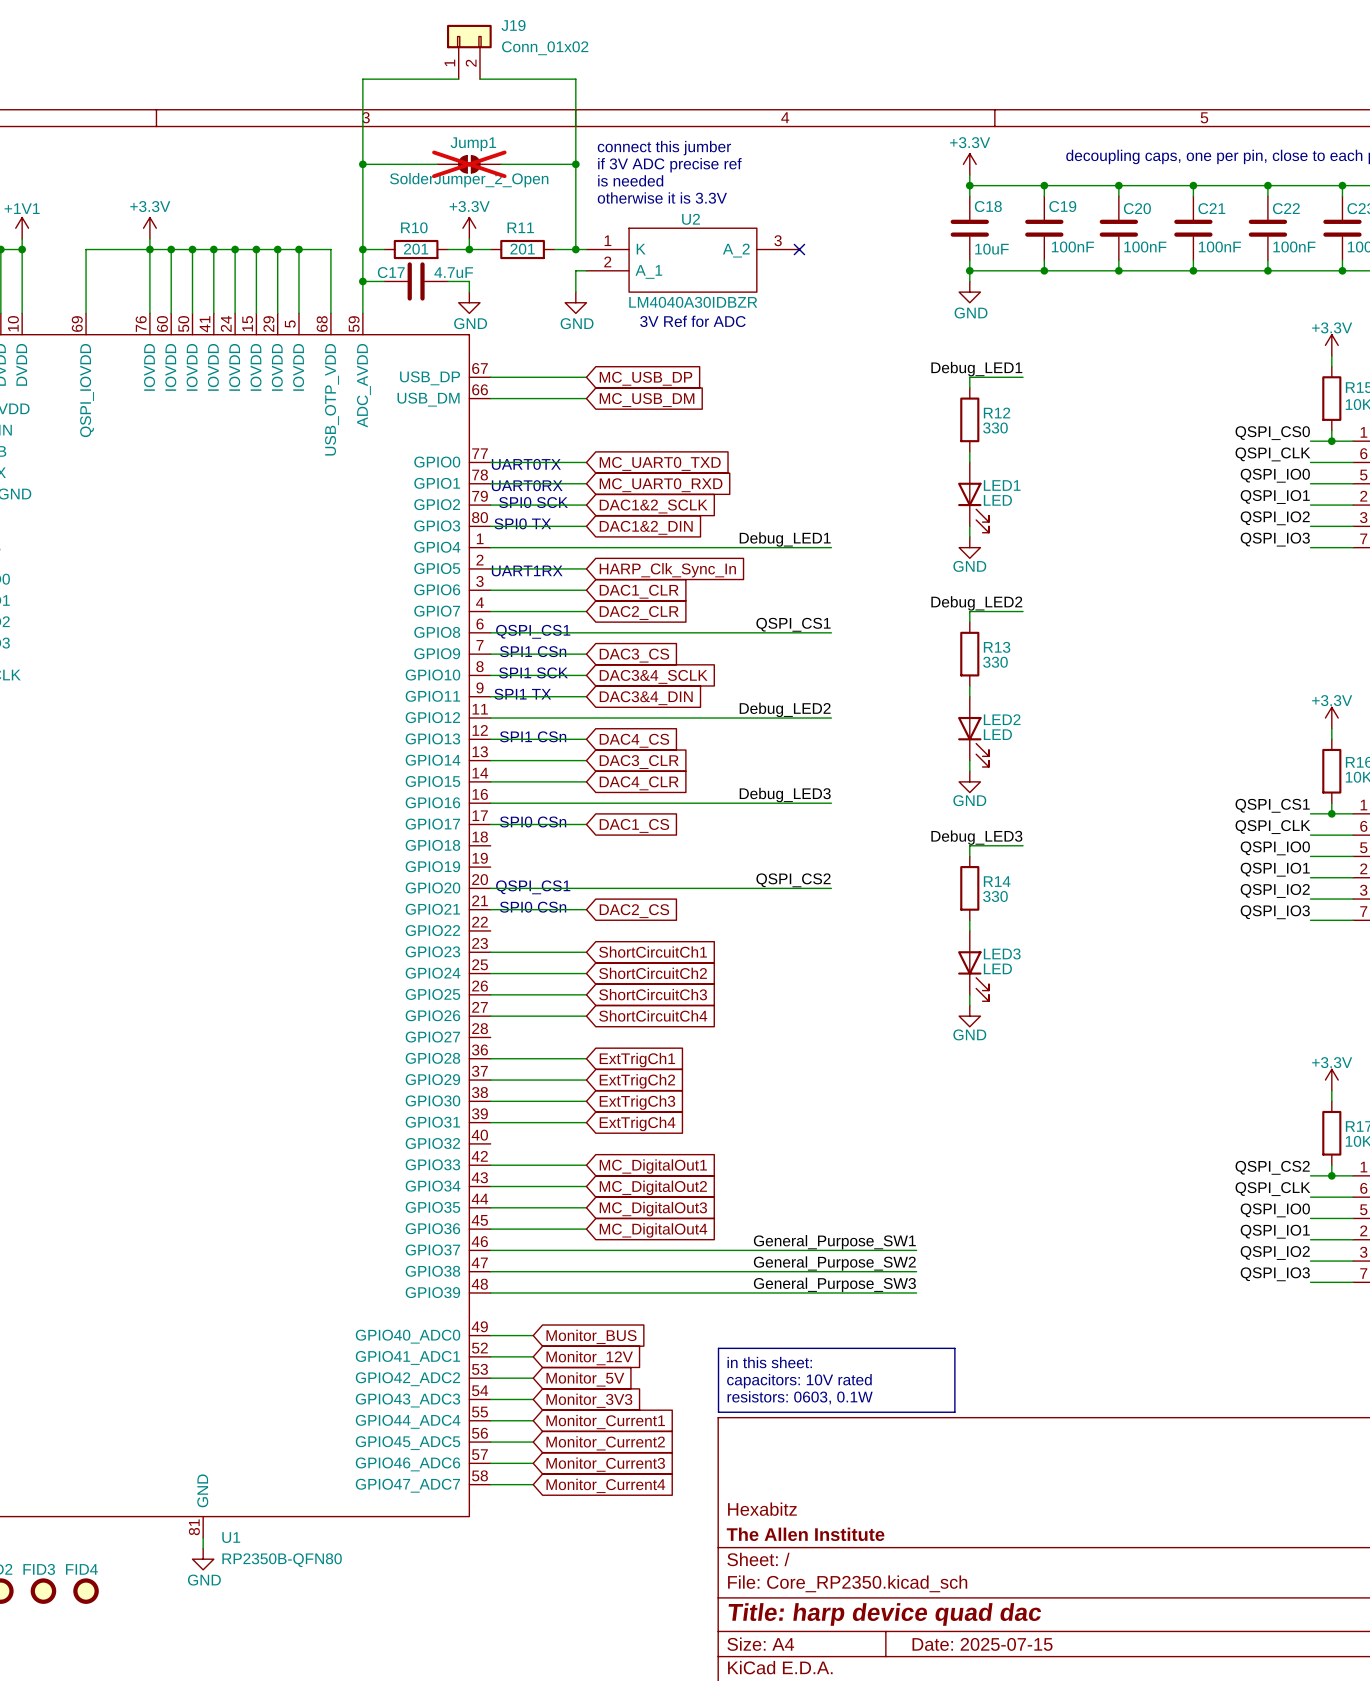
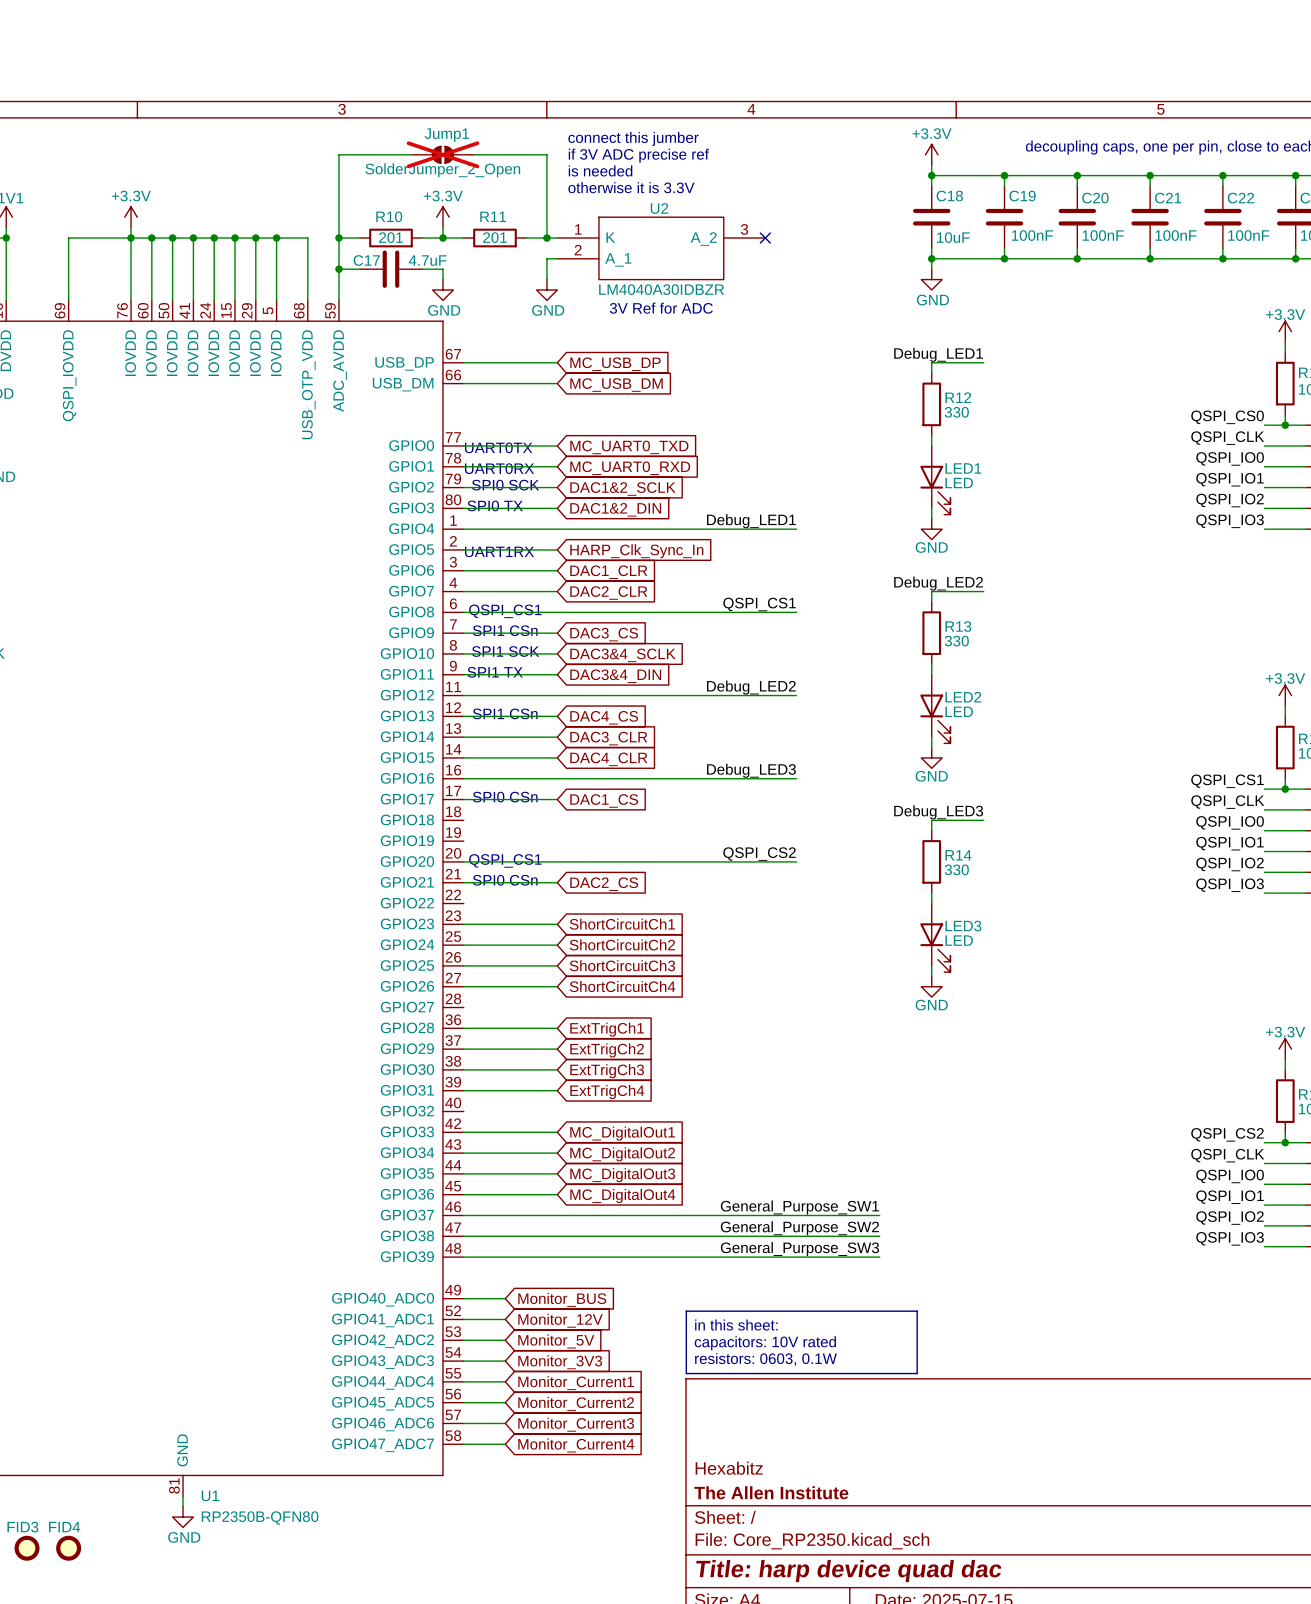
J19: Conn_01x02 (469, 52) -> none
wire: (458, 79) (362, 79) (362, 164) -> none
wire: (480, 79) (575, 79) (575, 164) -> none
junction: (362, 164) -> none
junction: (575, 164) -> none

